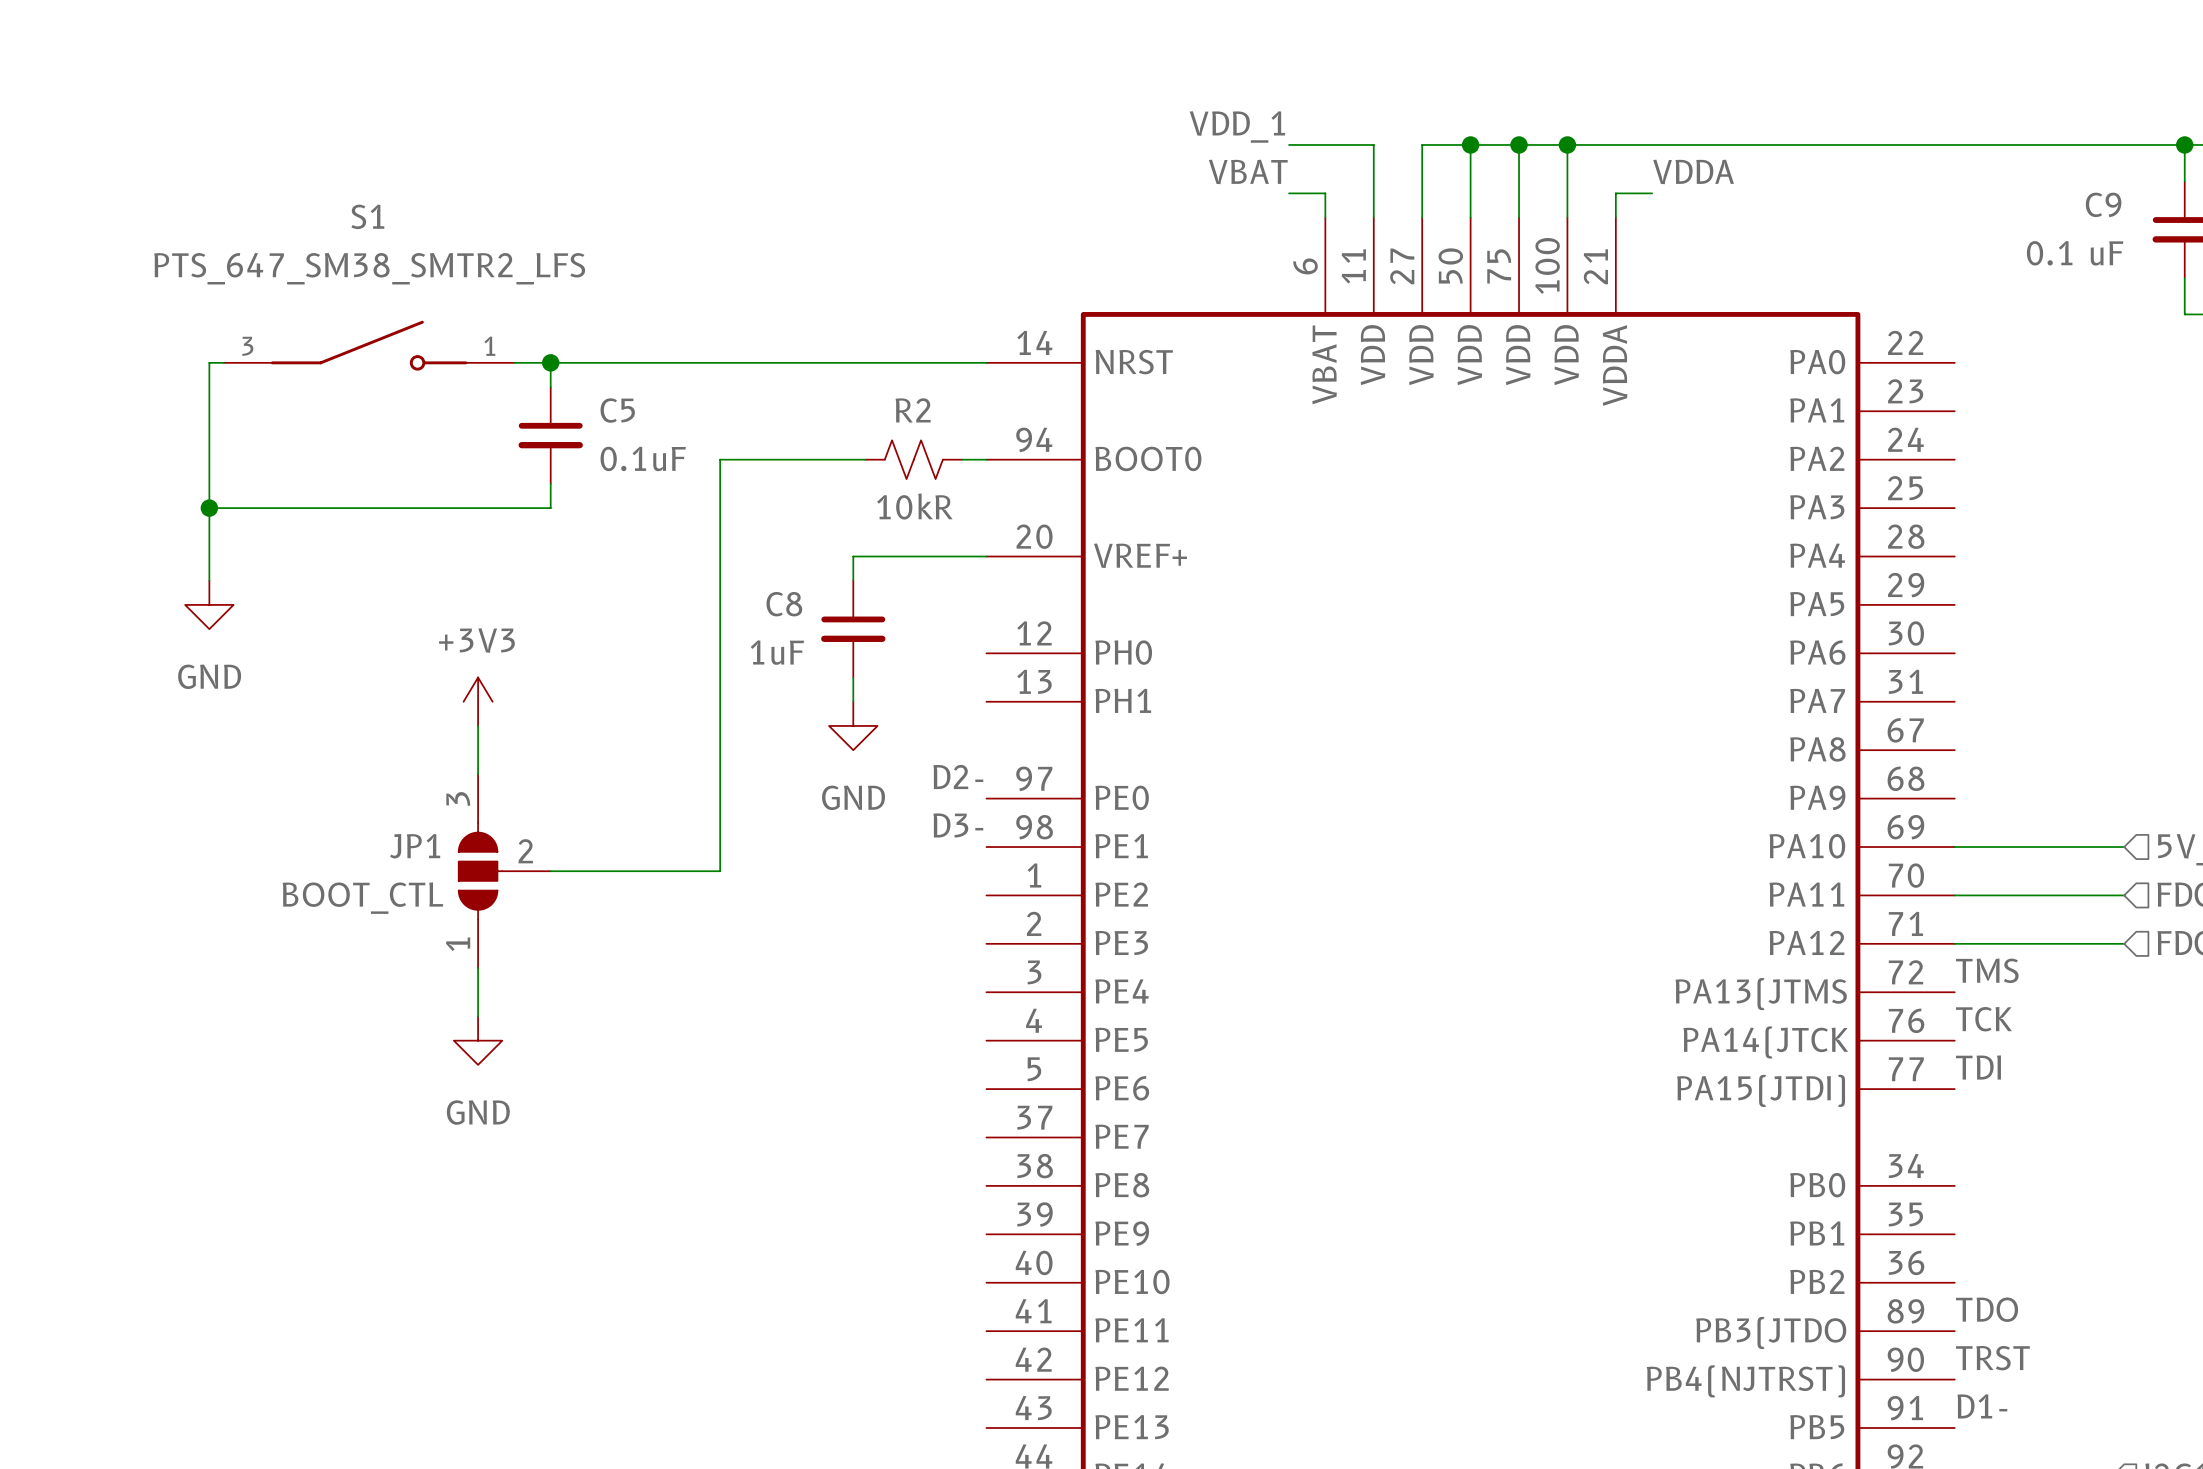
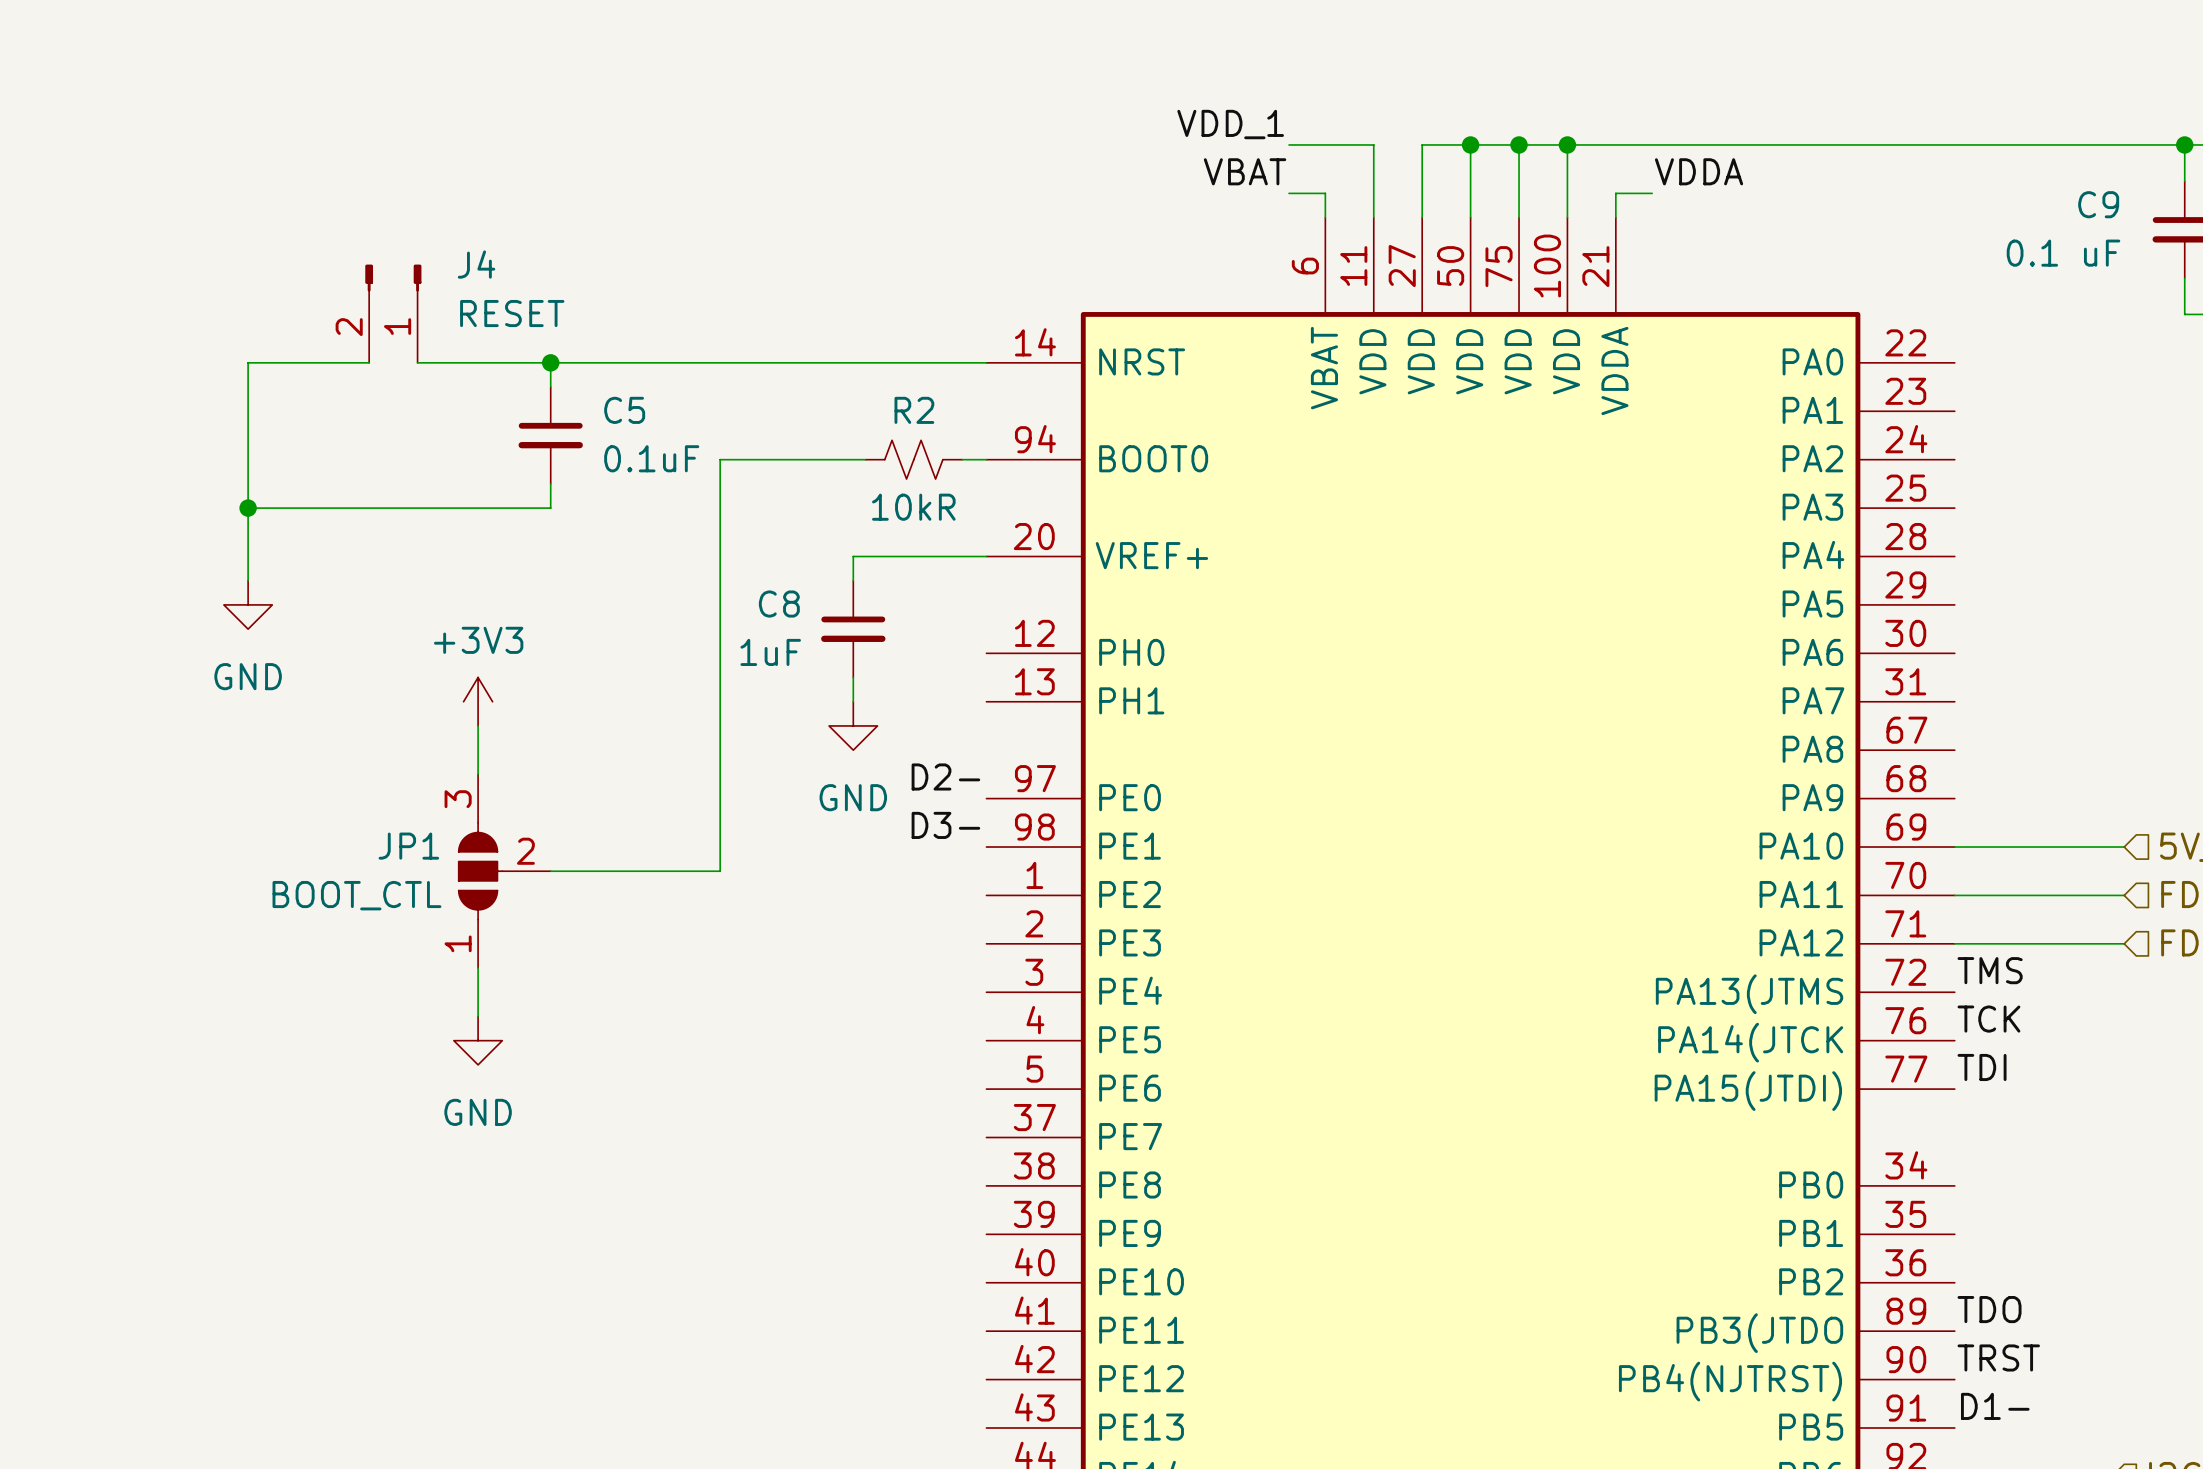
J4: none -> RESET (393, 313)
S1: PTS_647_SM38_SMTR2_LFS (369, 345) -> none
wire: (223, 362) (209, 362) (209, 580) -> none
wire: none -> (369, 362) (248, 362) (248, 580)
wire: (209, 508) (248, 508) -> none
junction position: (209, 508) -> (248, 508)
power symbol position: GND (209, 604) -> GND (248, 604)

